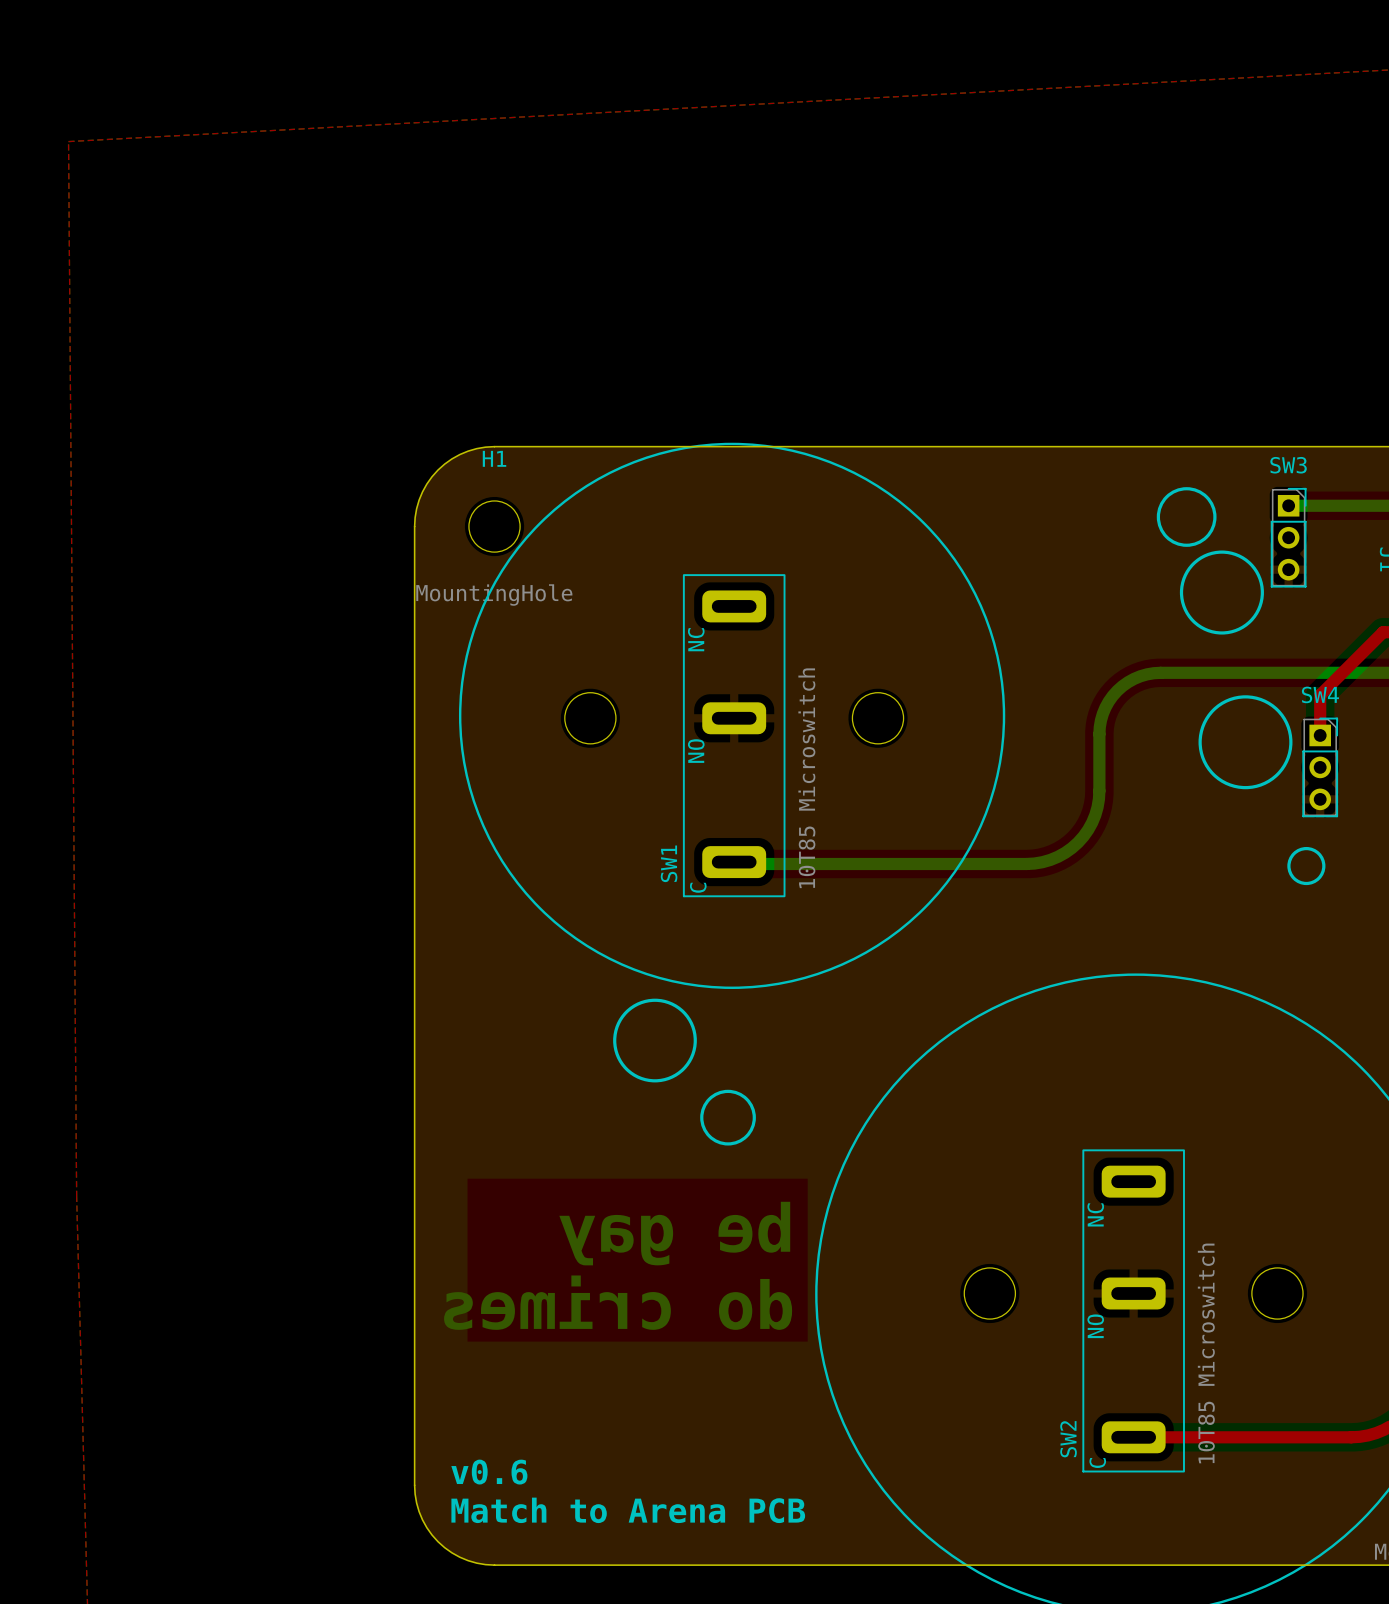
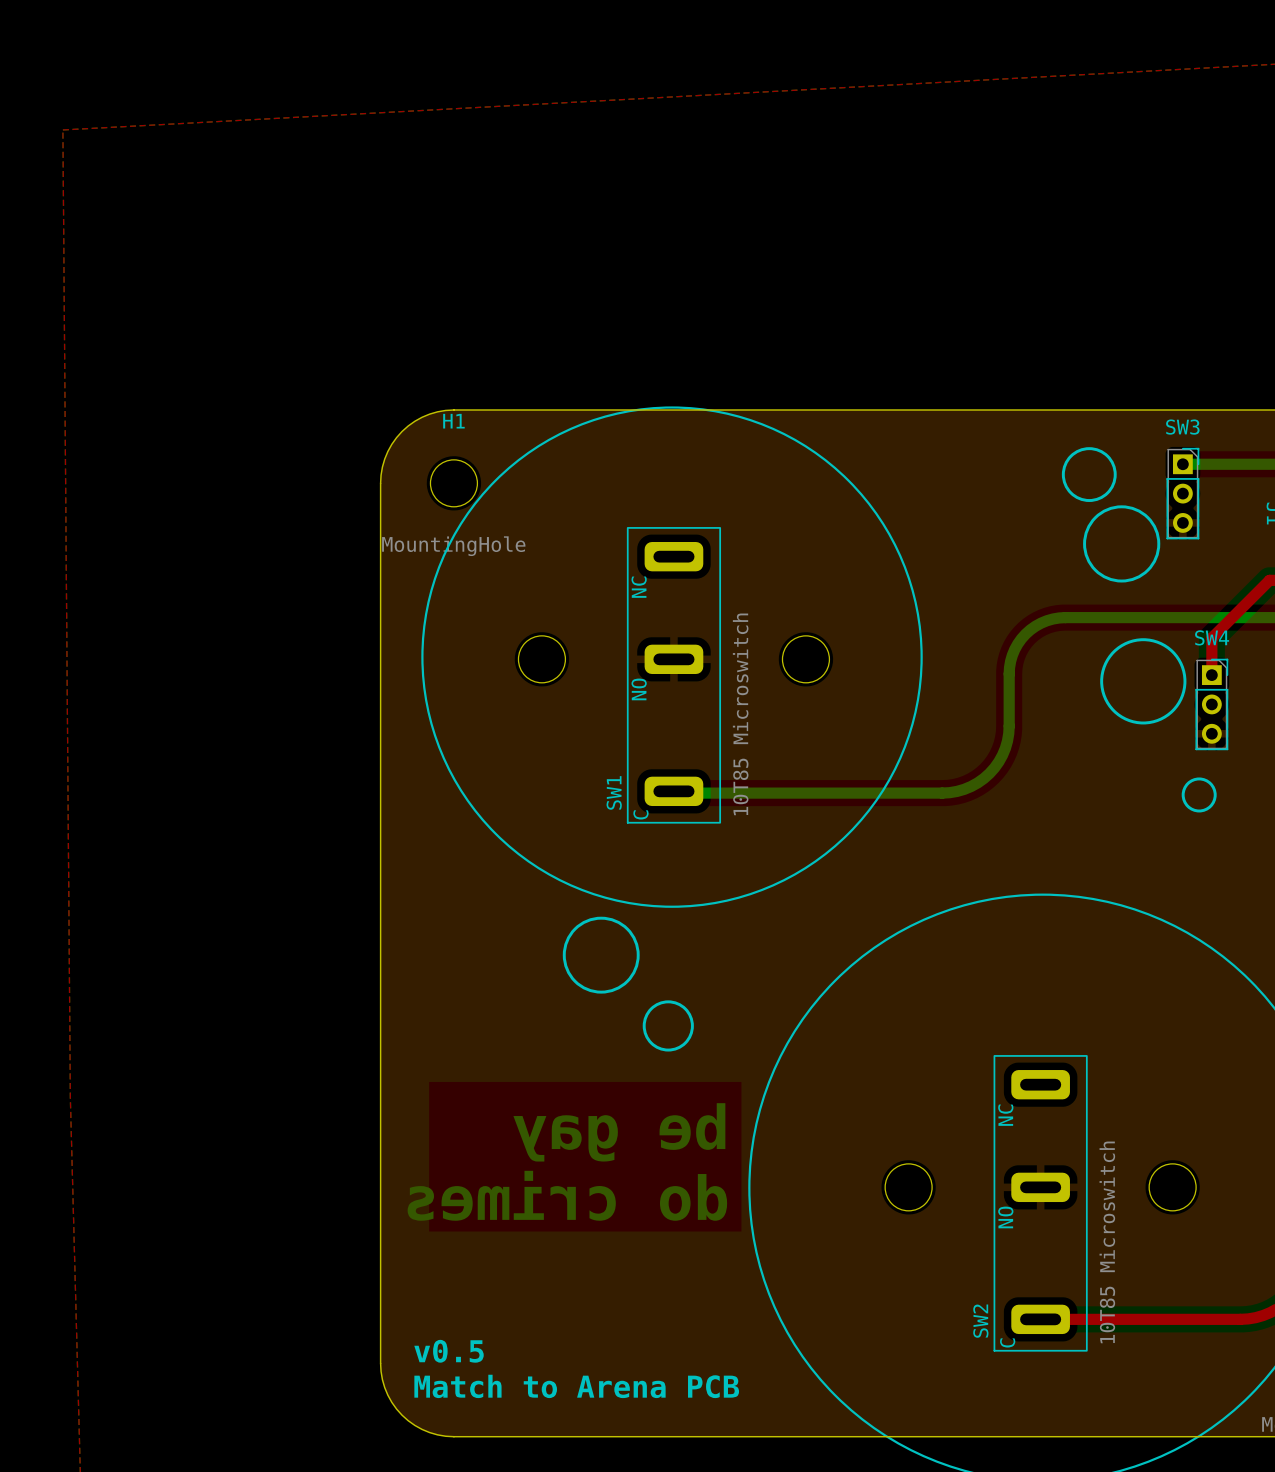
text: v0.6 (489, 1472) -> v0.5 (449, 1351)

